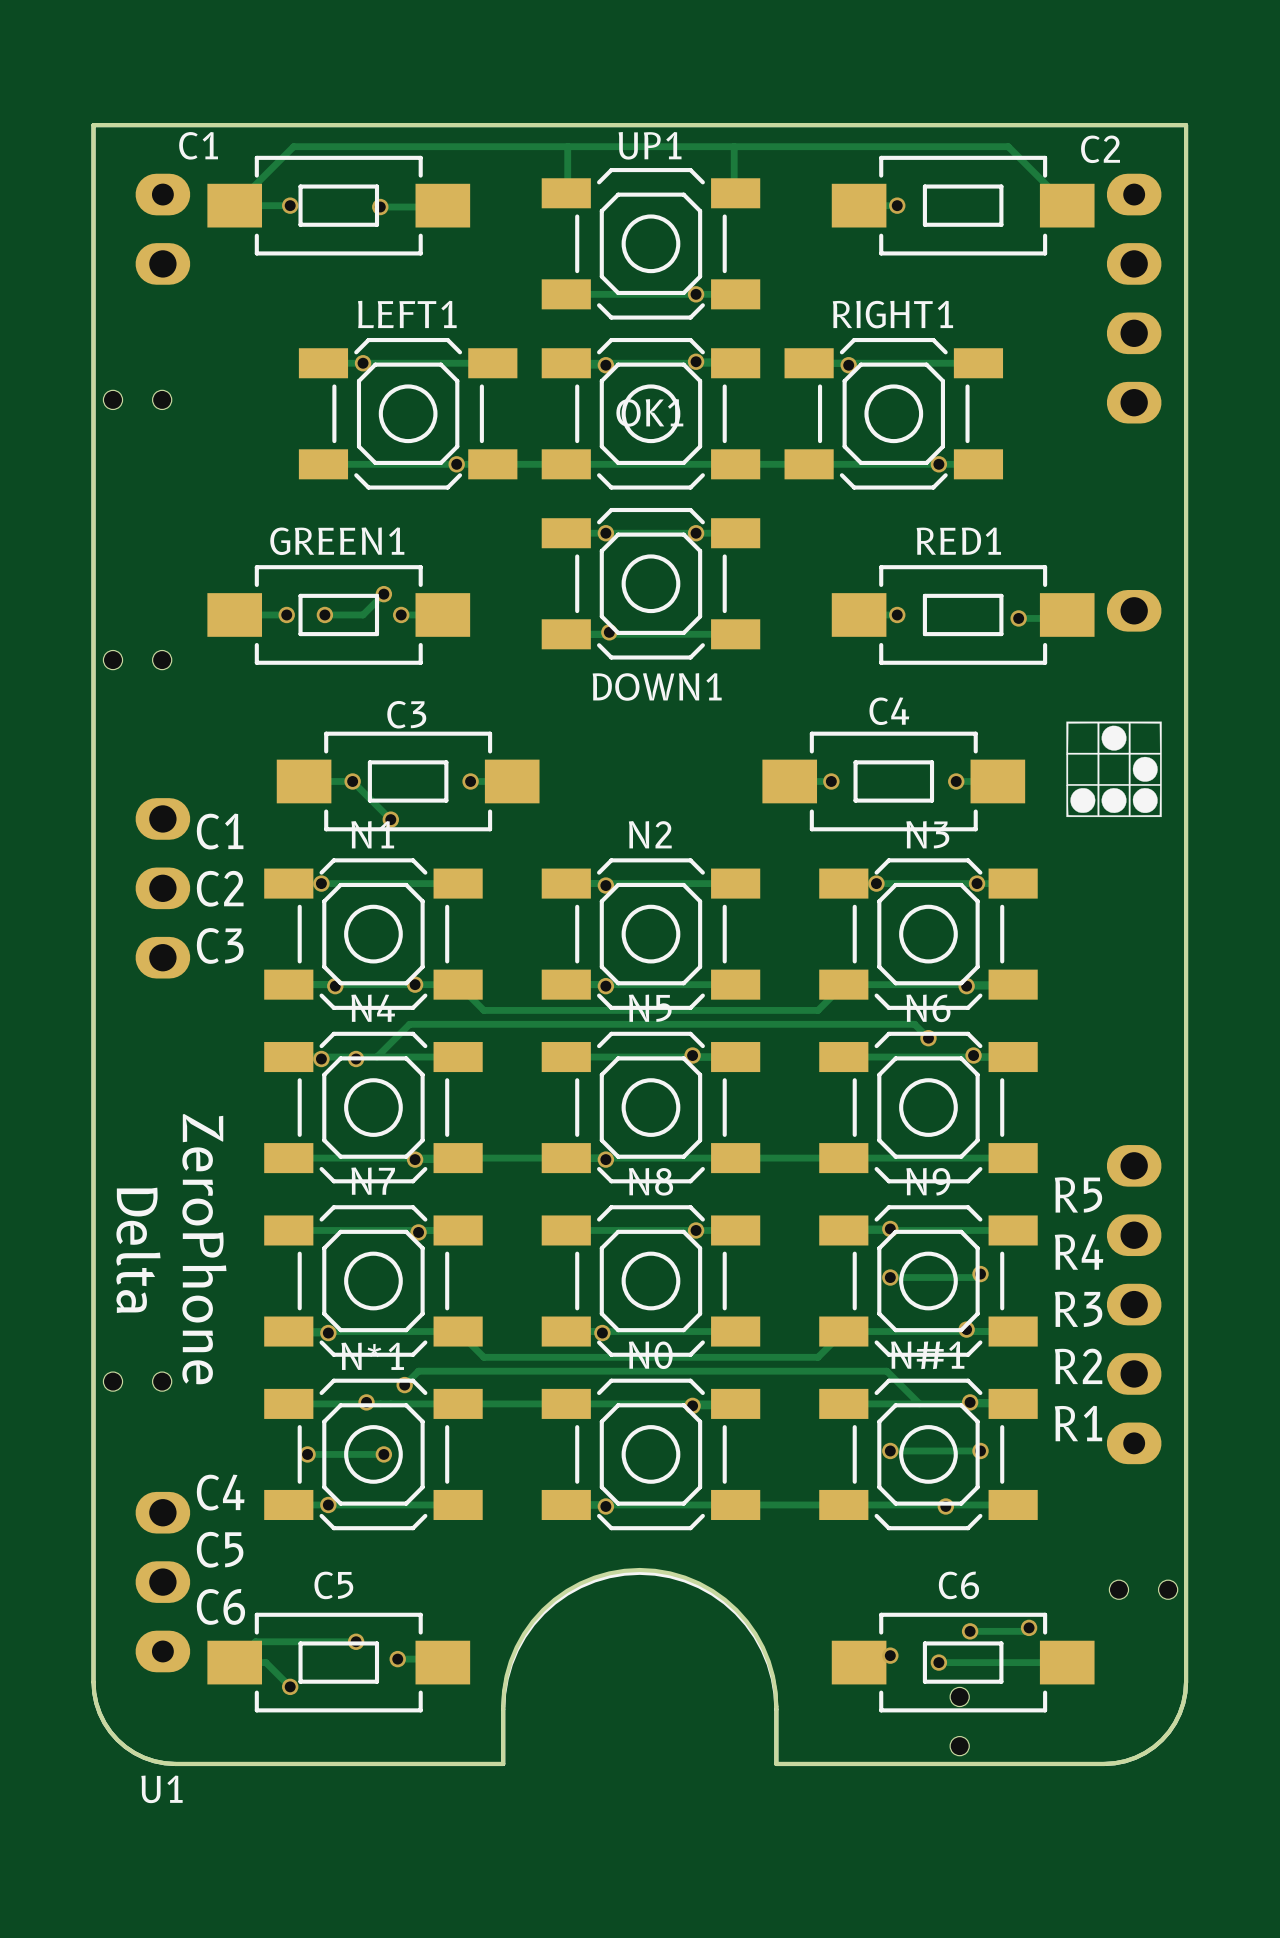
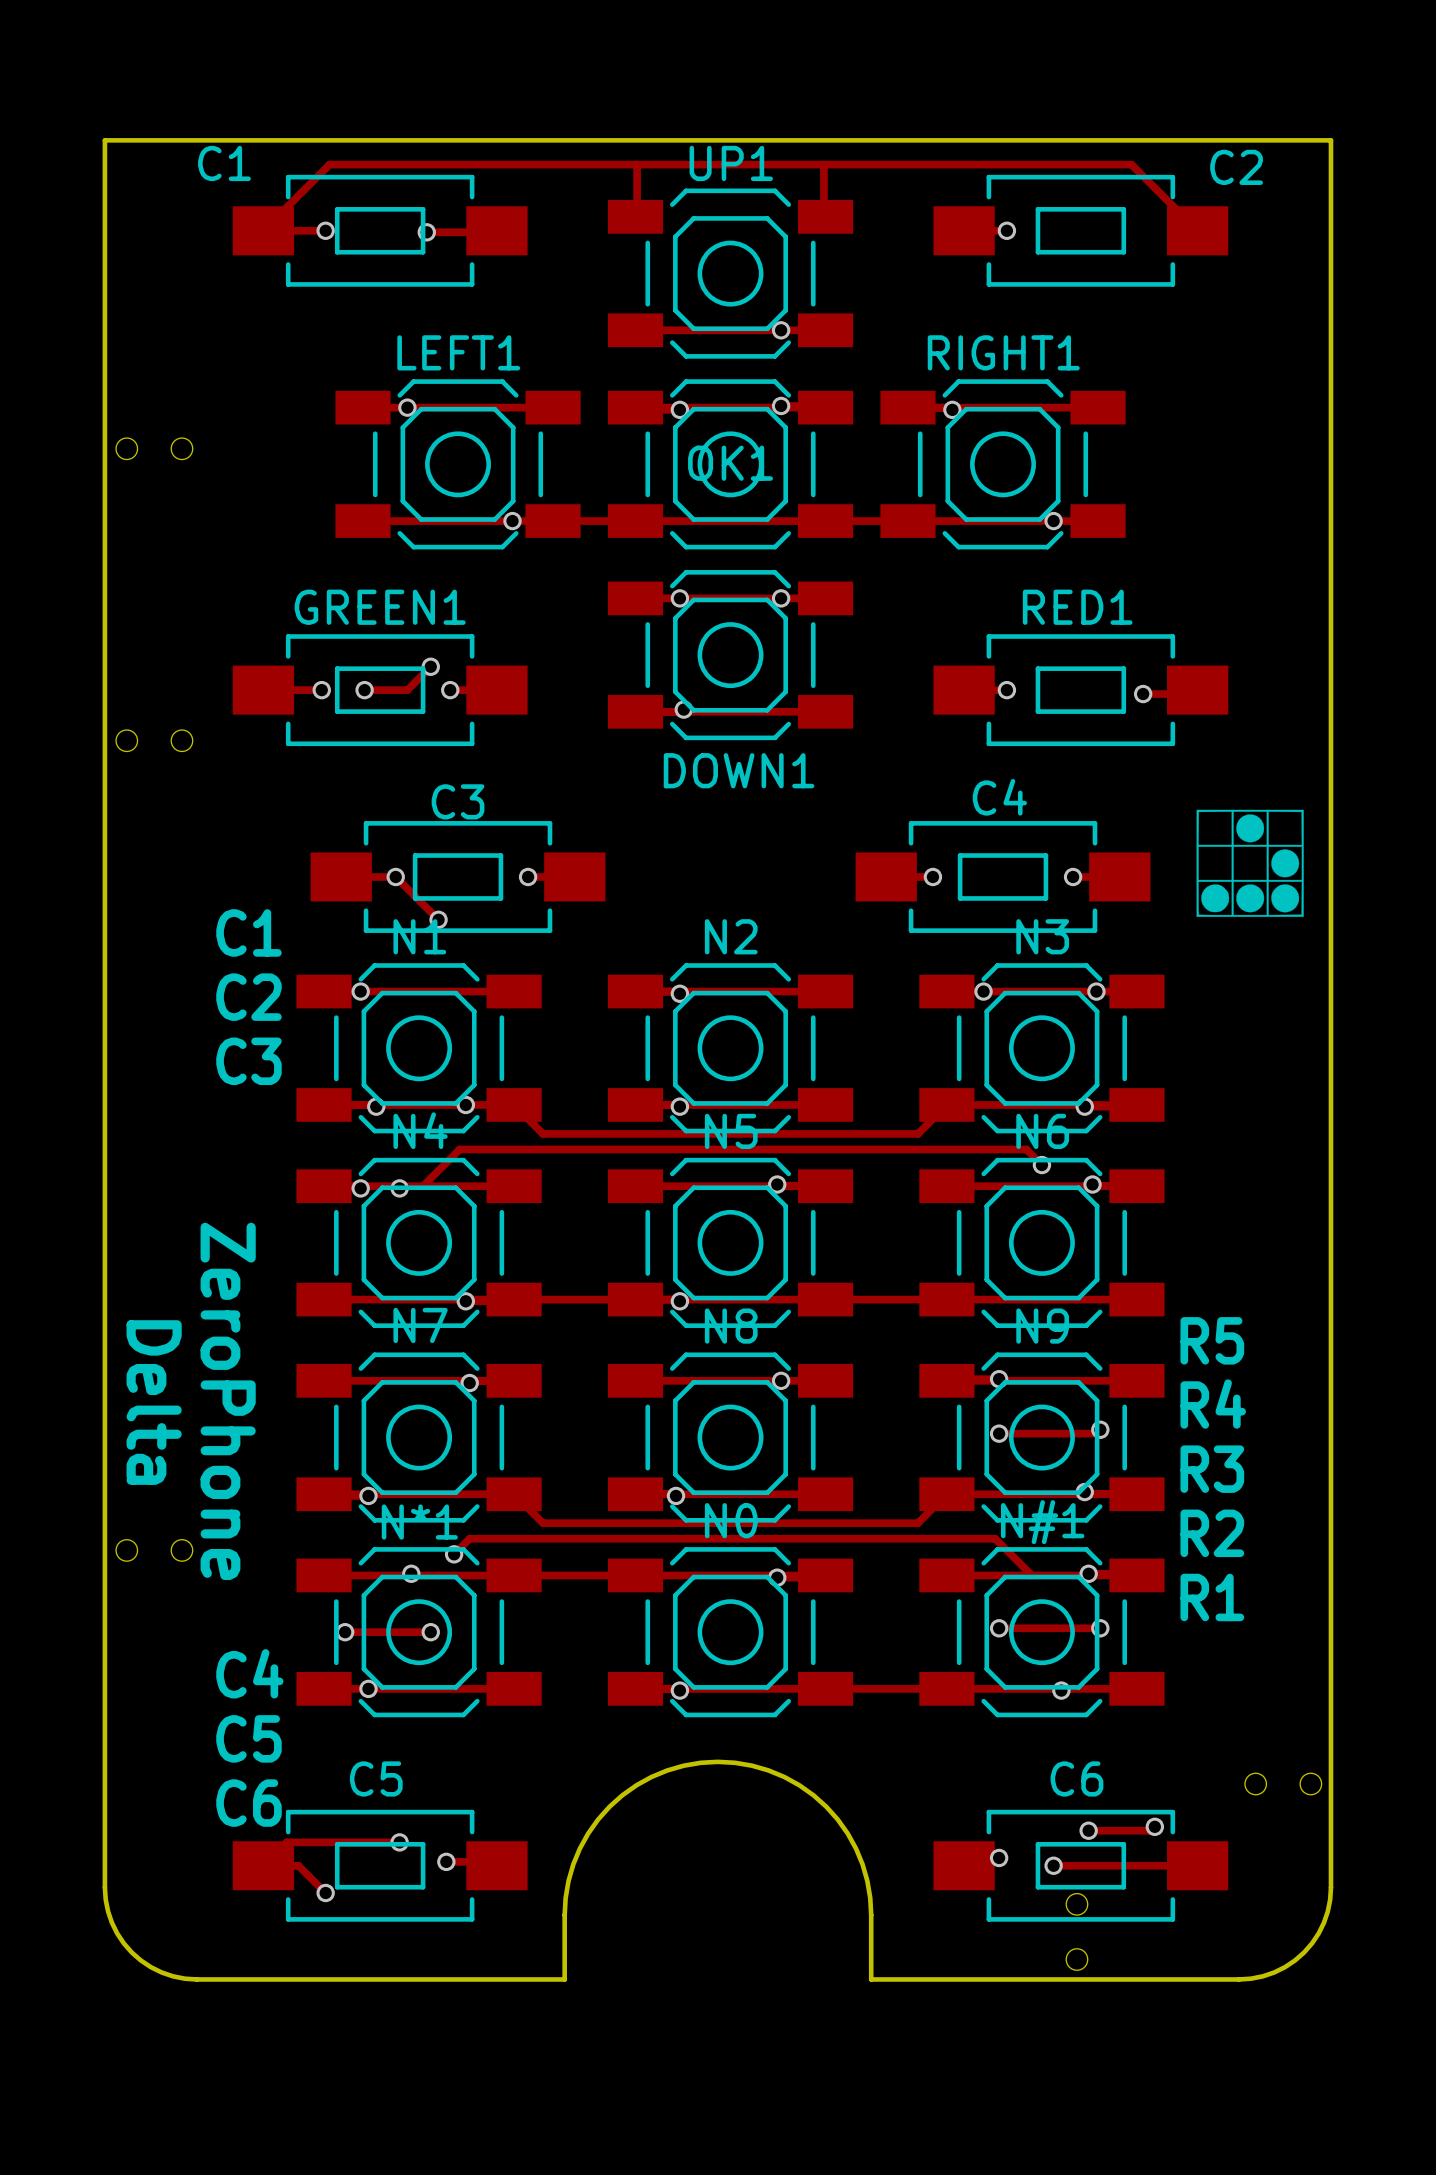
U1: (639, 944) -> none

